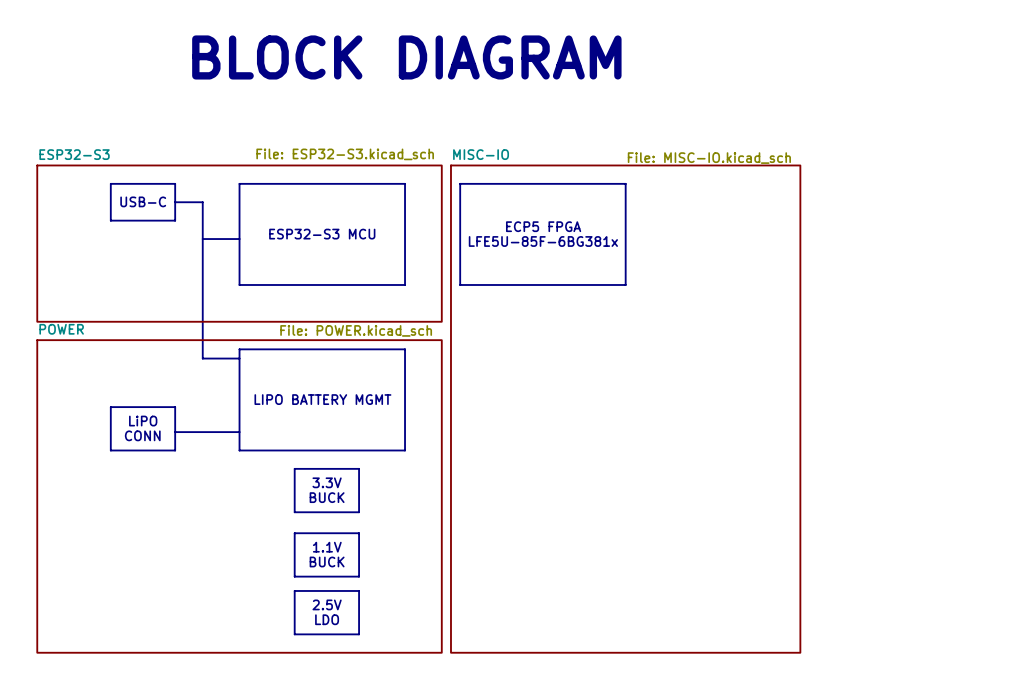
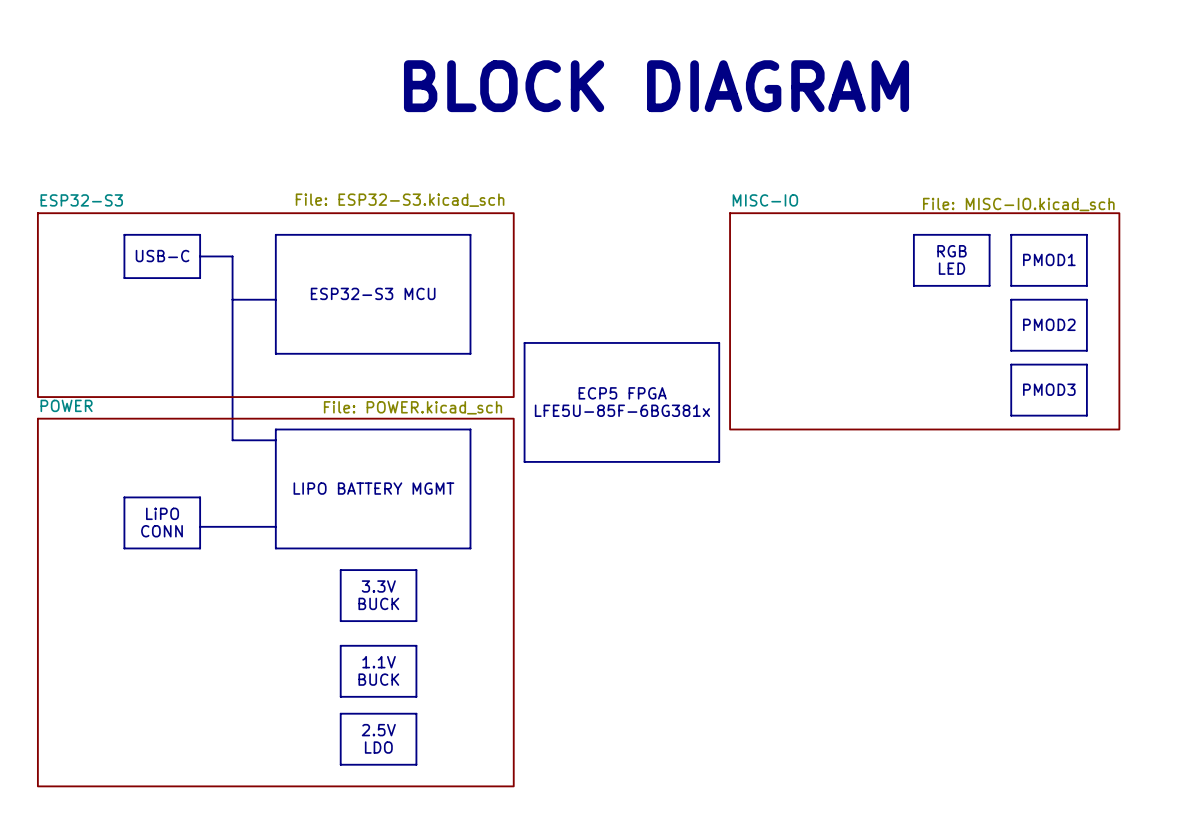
text position: BLOCK DIAGRAM (406, 57) -> BLOCK DIAGRAM (656, 86)
line: (460, 183) (625, 183) (625, 284) (460, 284) (460, 183) -> (524, 342) (719, 342) (719, 461) (524, 461) (524, 342)
line: none -> (913, 234) (989, 234) (989, 285) (913, 285) (913, 234)
line: none -> (1011, 234) (1086, 234) (1086, 285) (1011, 285) (1011, 234)
text: none -> RGB (952, 251)
text: none -> PMOD1 (1049, 259)
text: none -> LED (952, 268)
text position: ECP5 FPGA (543, 226) -> ECP5 FPGA (622, 393)
line: none -> (1011, 299) (1086, 299) (1086, 350) (1011, 350) (1011, 299)
text position: LFE5U-85F-6BG381x (543, 241) -> LFE5U-85F-6BG381x (622, 410)
sheet MISC-IO: none -> File: MISC-IO.kicad_sch (924, 321)
text: none -> PMOD2 (1049, 324)
line: none -> (1011, 364) (1011, 415) (1086, 415) (1086, 364) (1011, 364)
text: none -> PMOD3 (1049, 389)
sheet MISC-IO: File: MISC-IO.kicad_sch (625, 409) -> none

